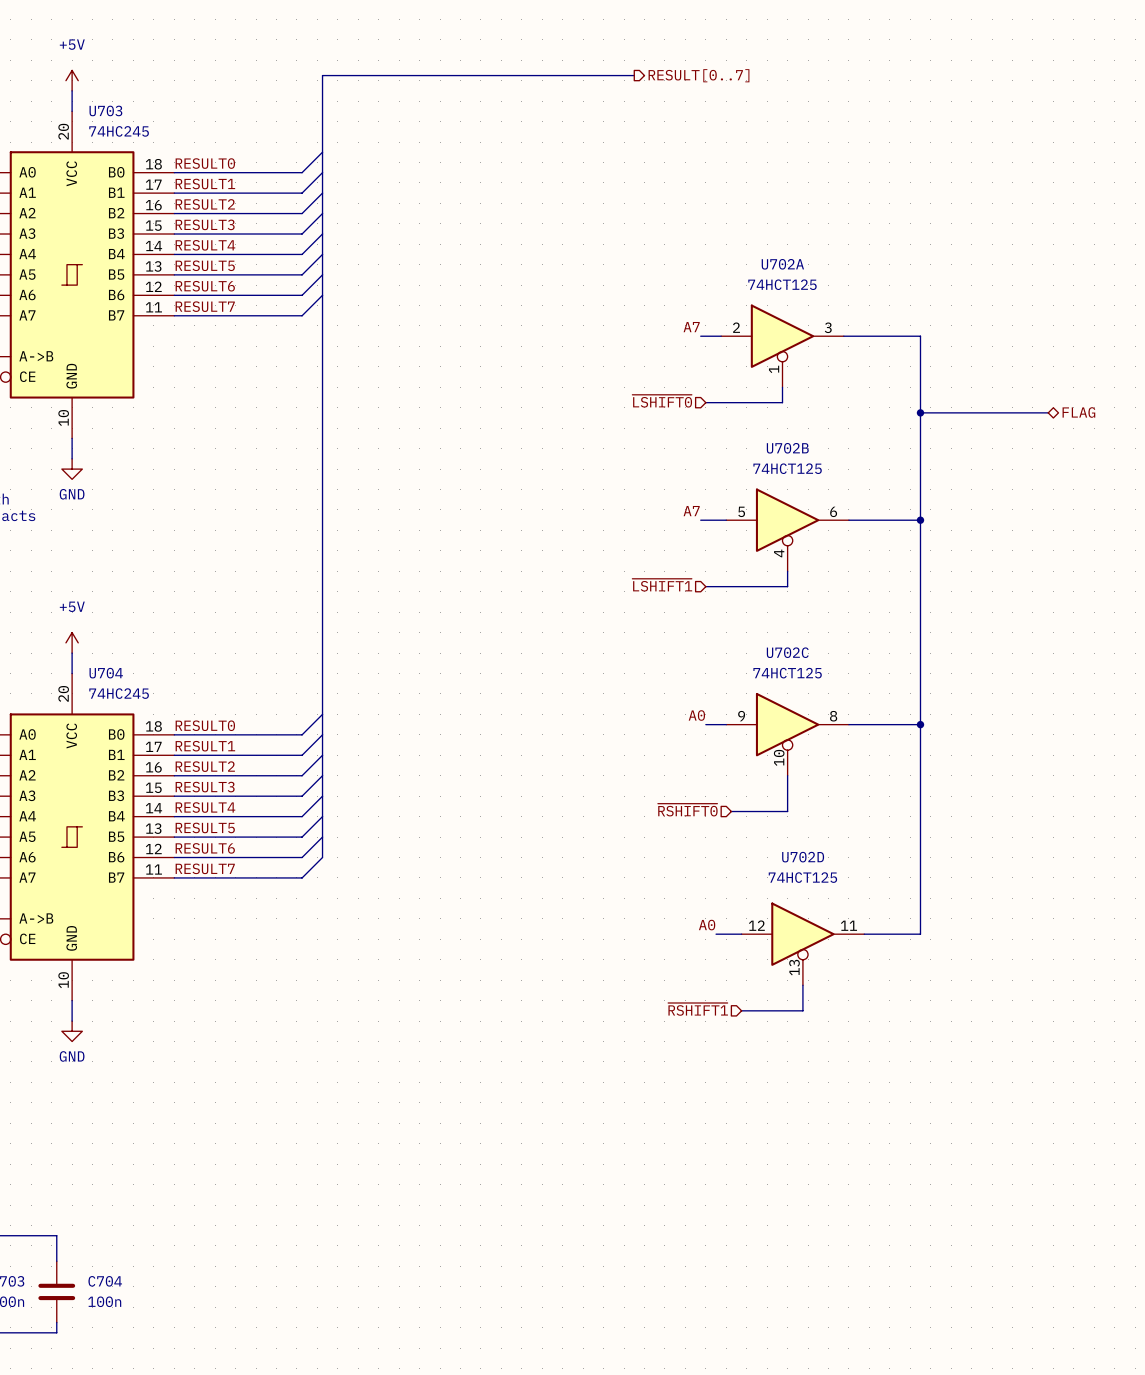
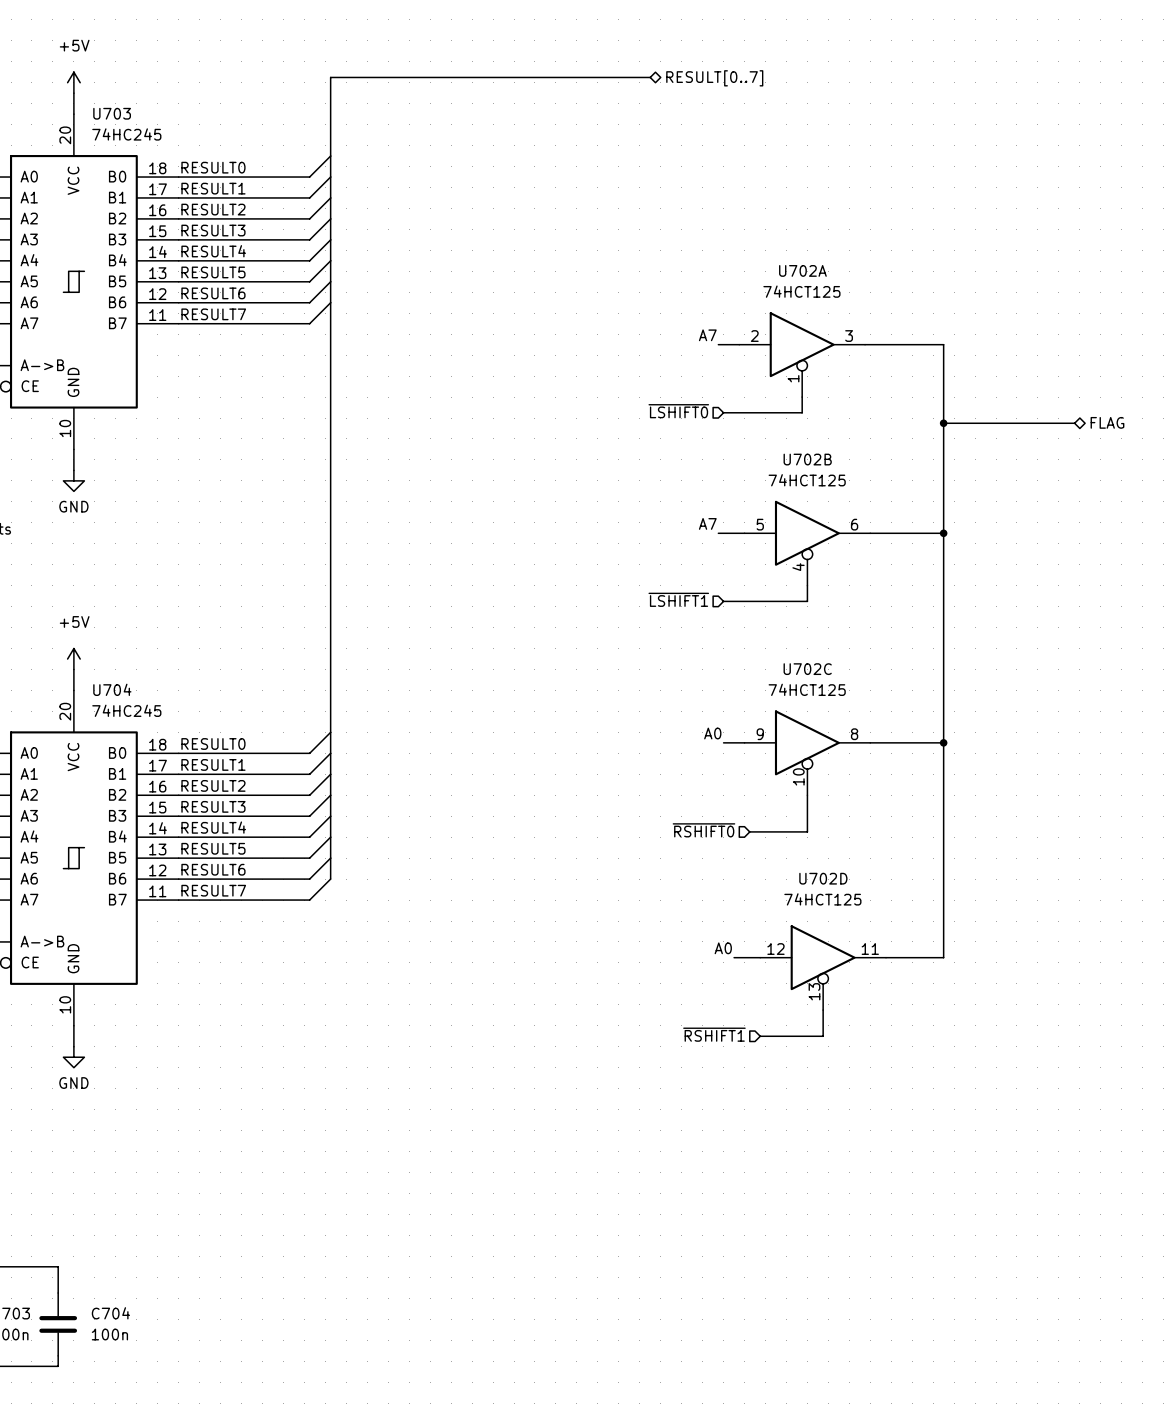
hierarchical label shape: output (699, 75) -> bidirectional (714, 78)

